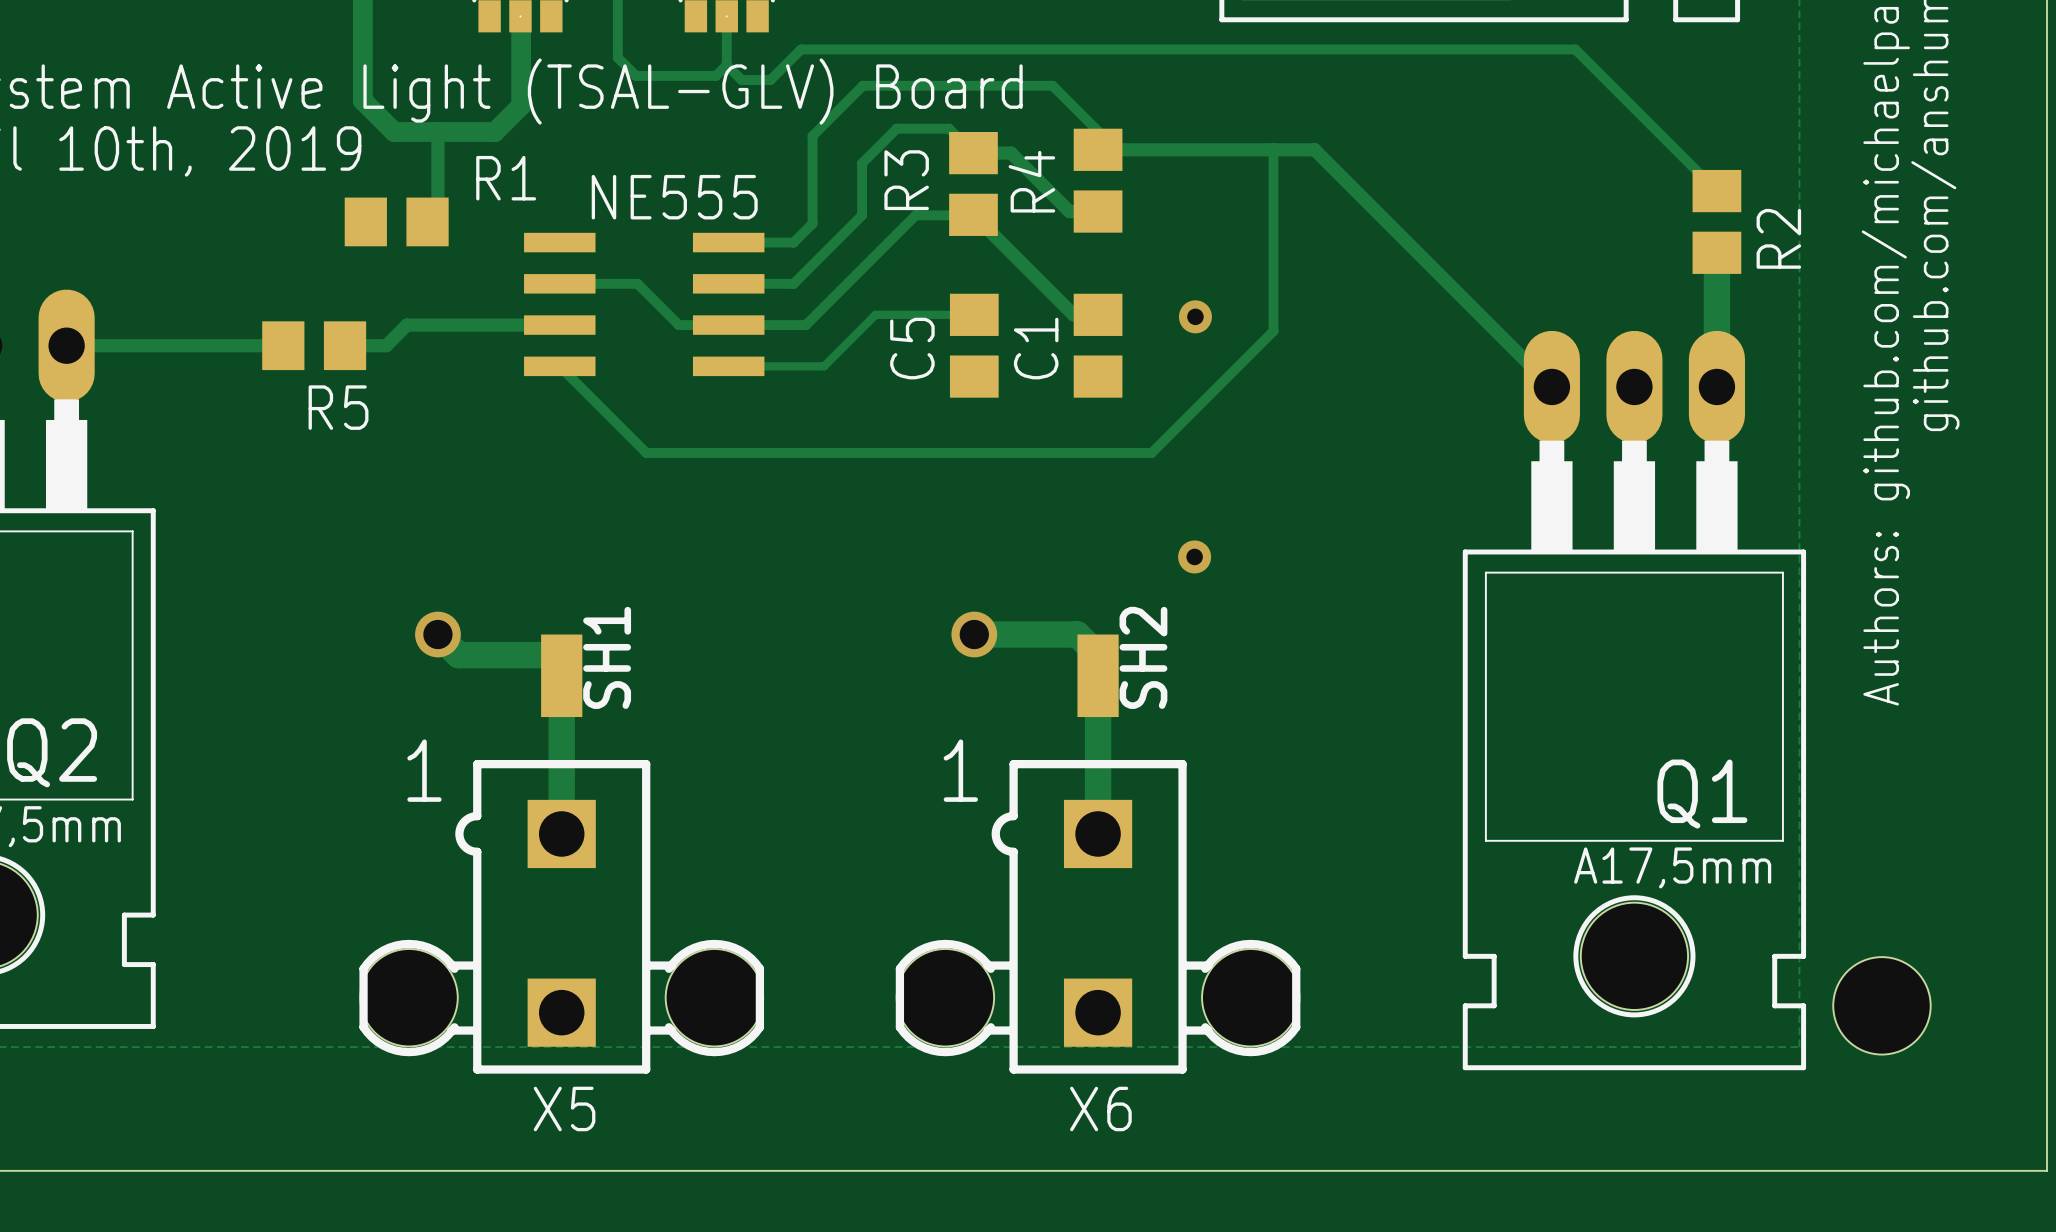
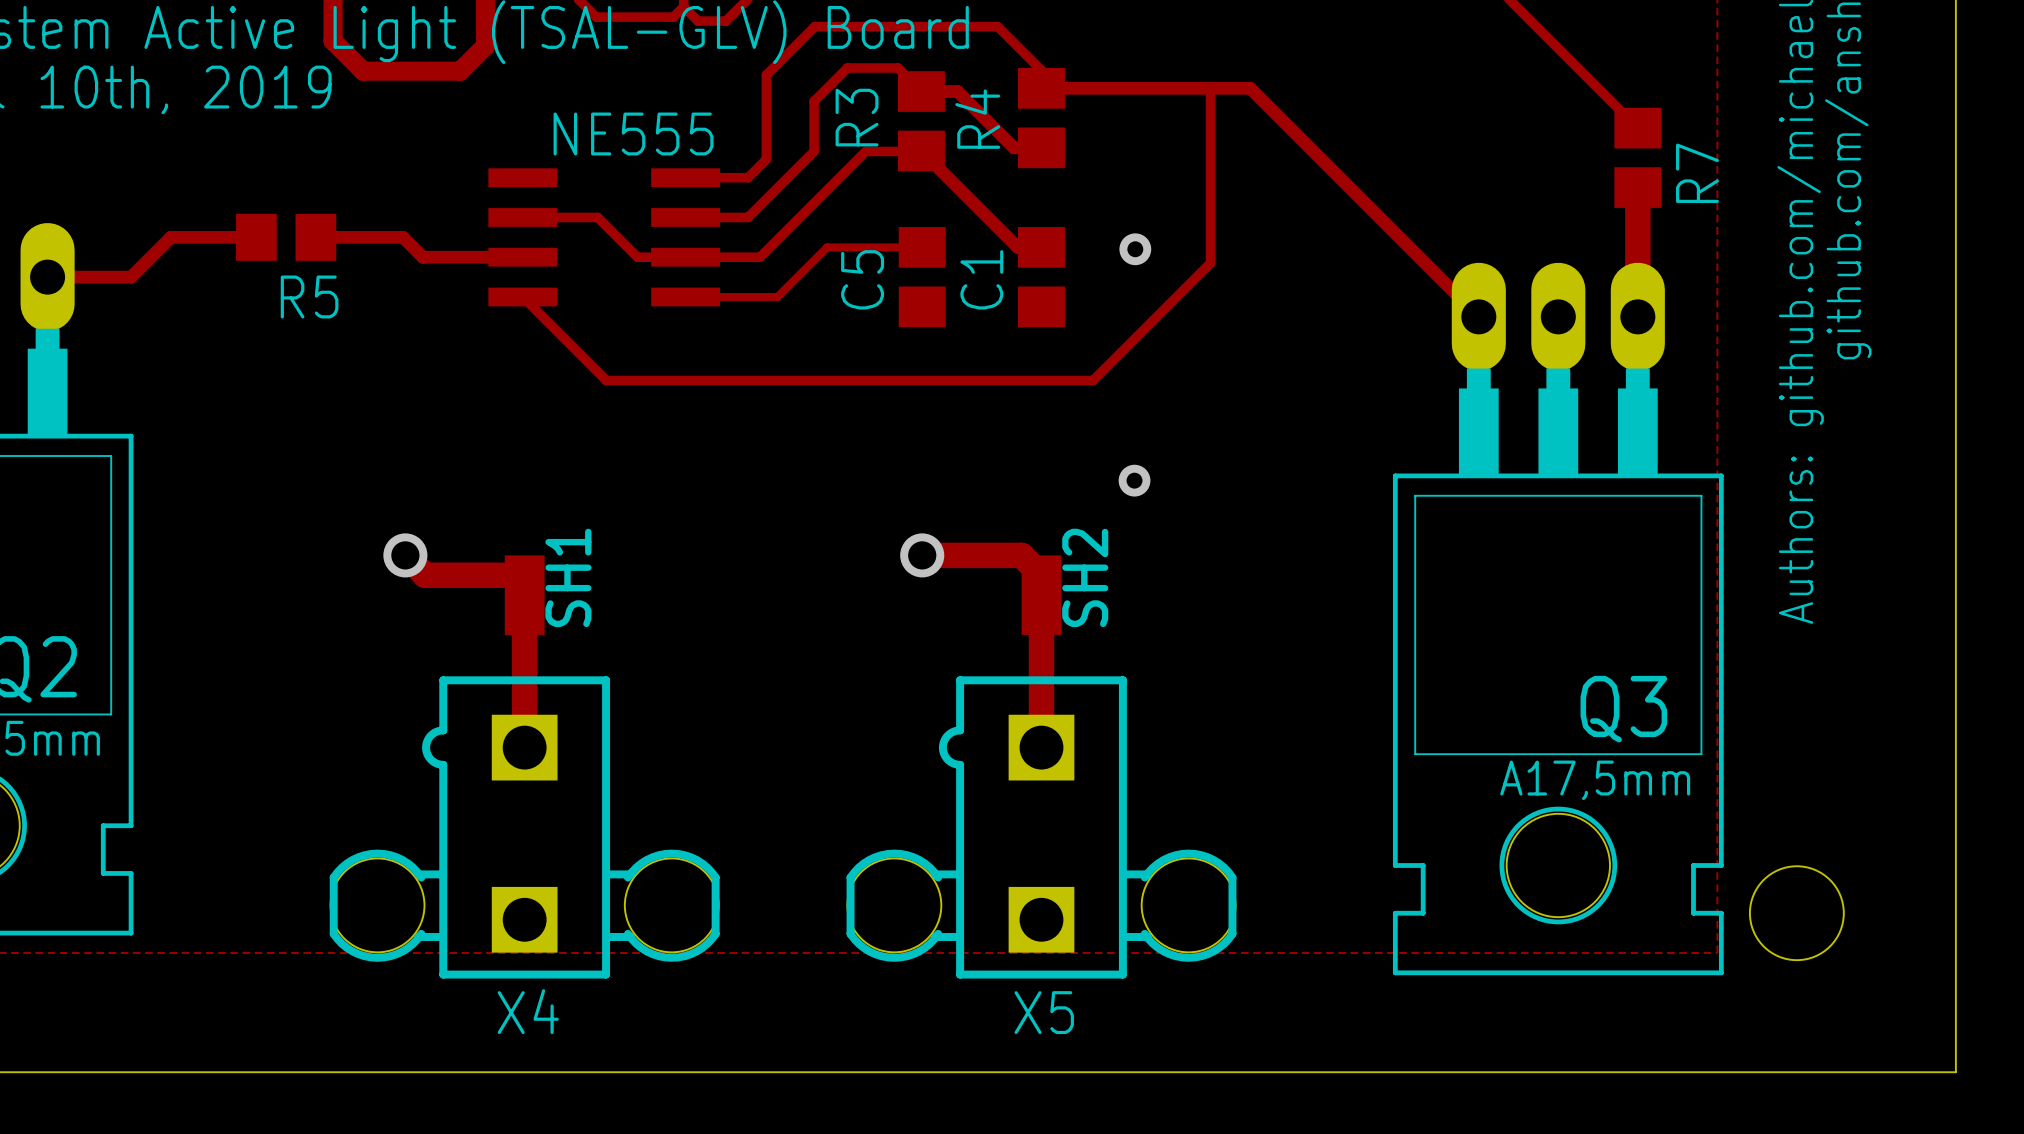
track: (437, 131) (437, 211) (427, 221) -> none
R1: (396, 221) -> none
R2 name: R2 (1778, 238) -> R7 (1697, 173)
track: none -> (315, 237) (403, 237) (422, 257) (421, 258)
track: (456, 325) (406, 325) (386, 345) (345, 345) -> none
track: (153, 345) (283, 345) -> (131, 277) (170, 237) (256, 237)
R5 position: (314, 345) -> (286, 237)
text: 1 (424, 770) -> none
text: 1 (960, 770) -> none
Q1 name: Q1 (1702, 794) -> Q3 (1623, 709)
X5 name: X5 (564, 1108) -> X4 (528, 1011)
X6 name: X6 (1100, 1108) -> X5 (1044, 1012)

